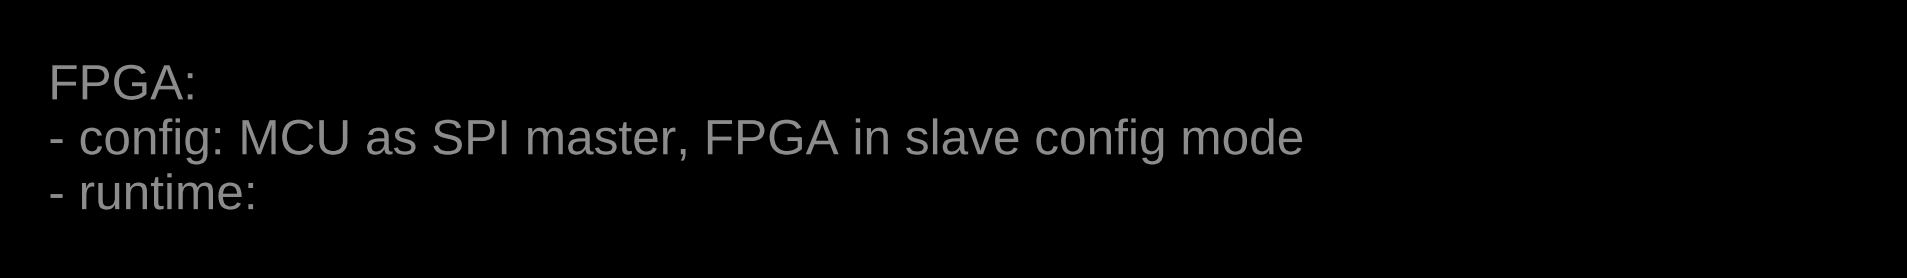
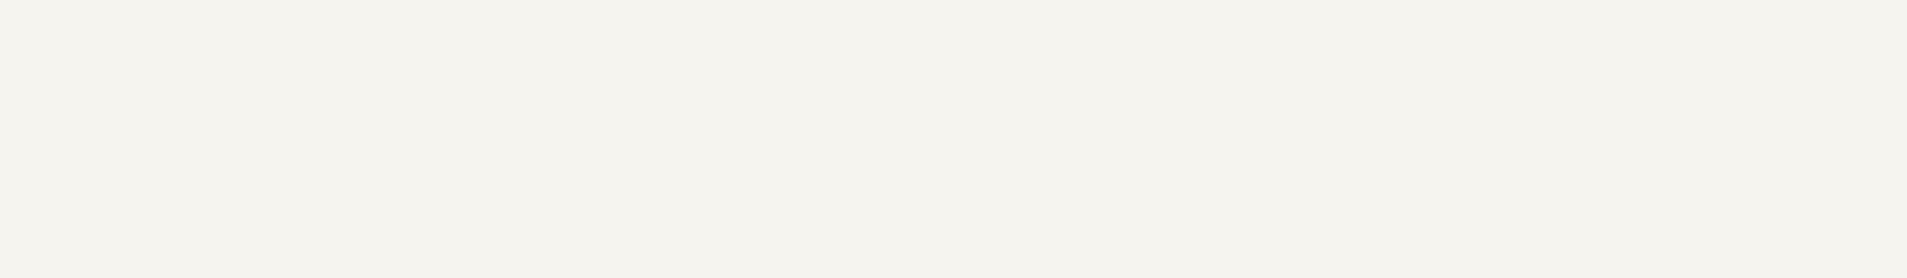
text: FPGA: (122, 82) -> none
text: - config: MCU as SPI master, FPGA in slave config mode (676, 141) -> none
text: - runtime: (151, 191) -> none

